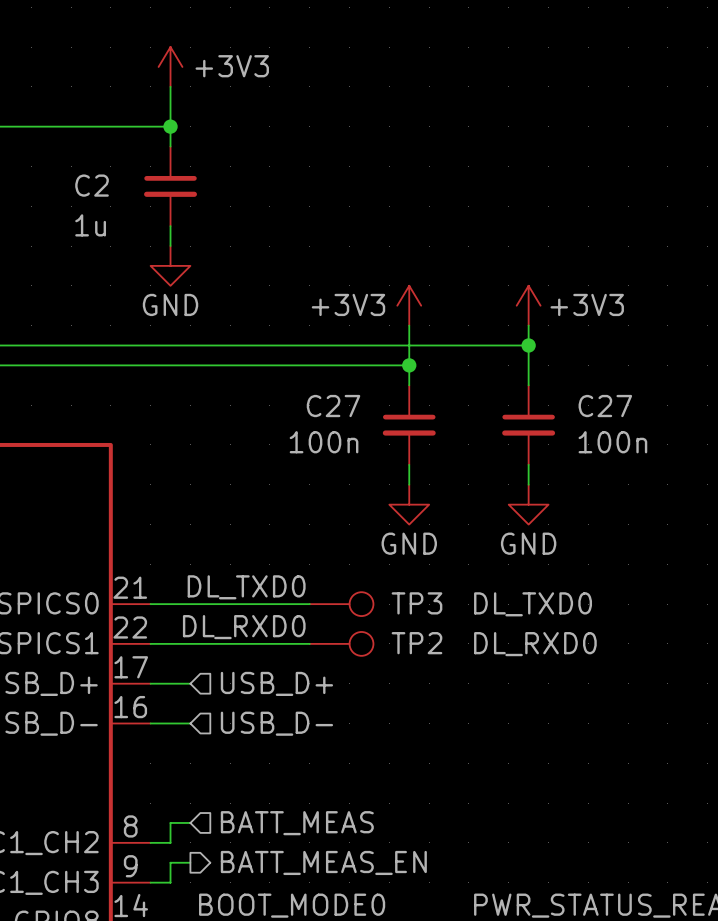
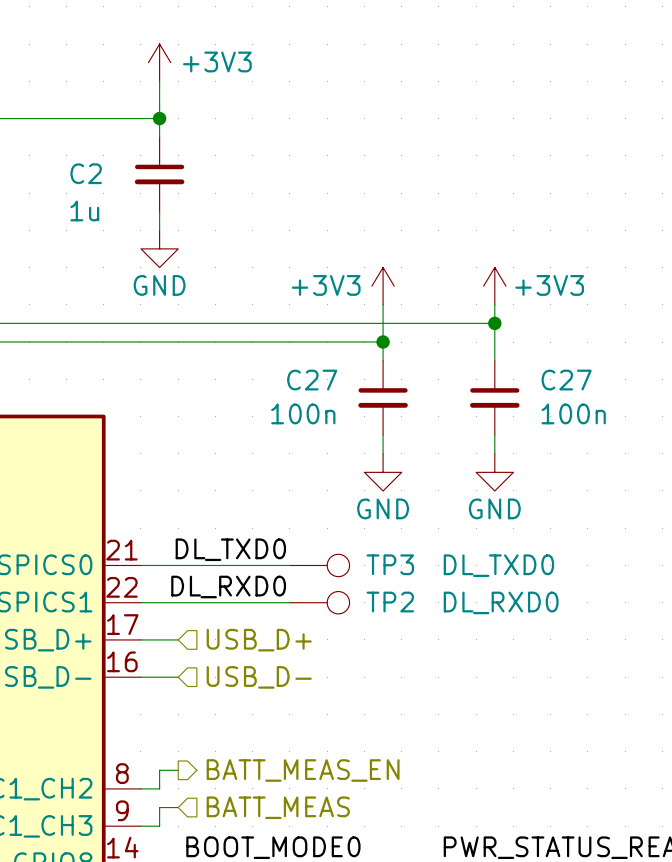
hierarchical label shape: input (297, 823) -> output (303, 770)
hierarchical label: BATT_MEAS (297, 823) -> BATT_MEAS_EN (303, 770)
hierarchical label shape: output (323, 862) -> input (278, 807)
hierarchical label: BATT_MEAS_EN (323, 862) -> BATT_MEAS (278, 807)

